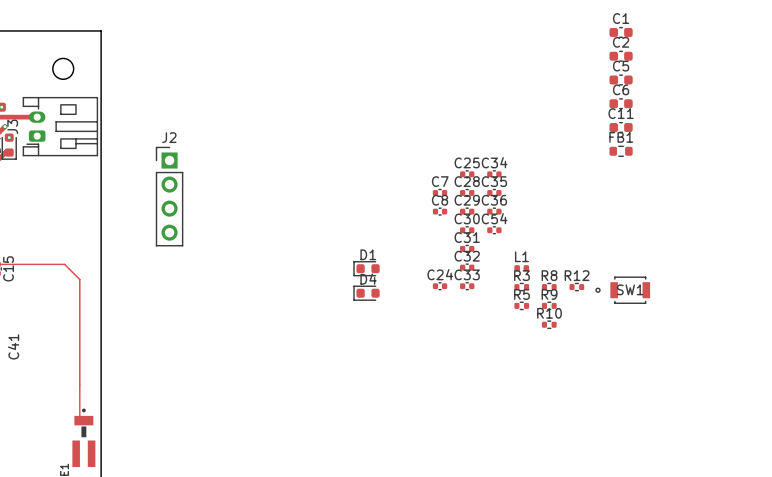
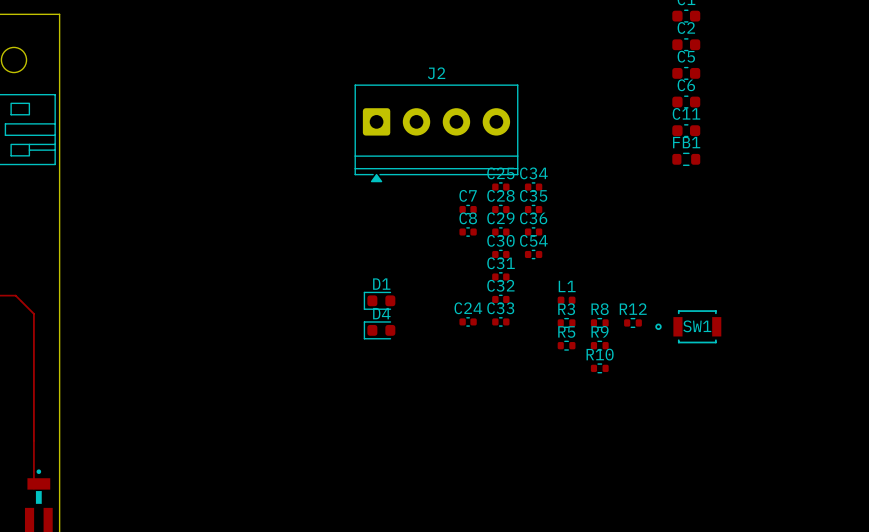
J2 footprint: [155, 146, 184, 247] -> [354, 84, 519, 183]

